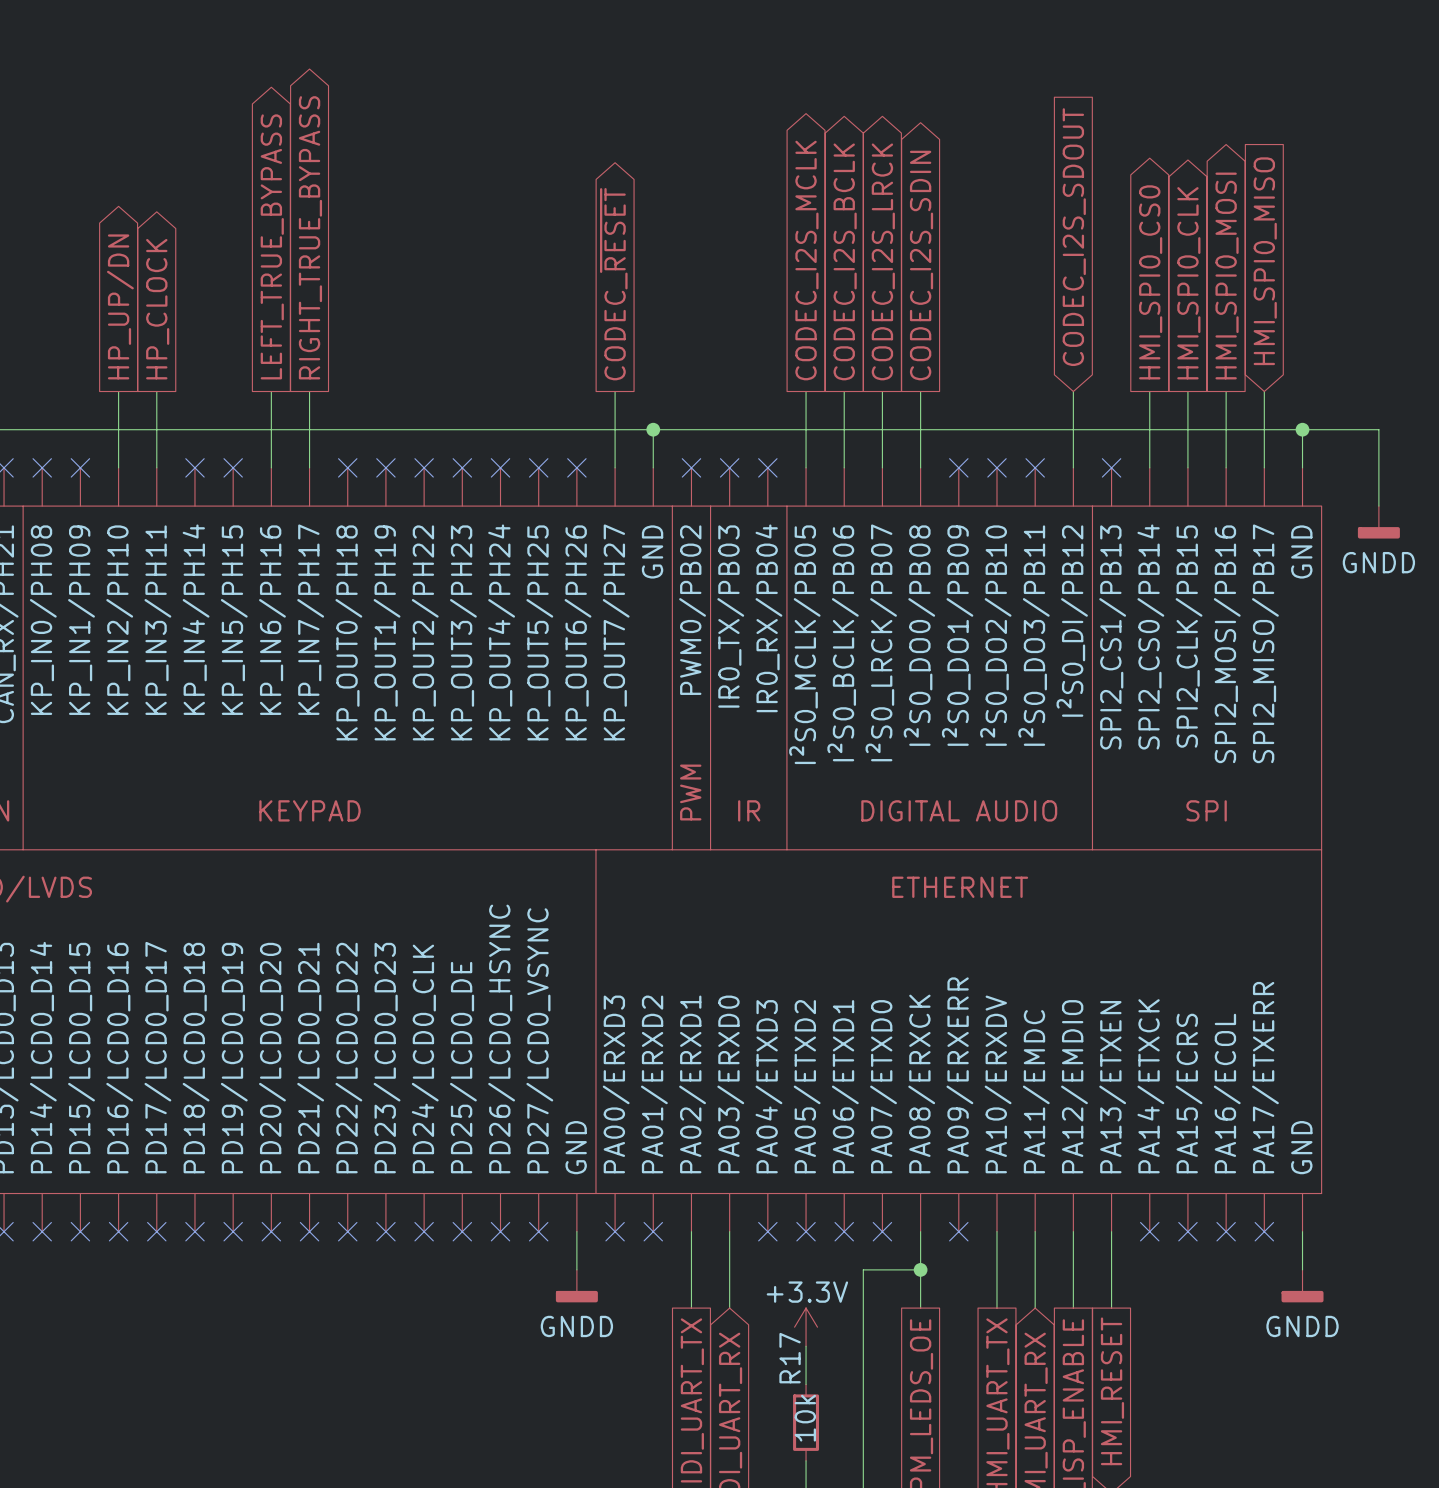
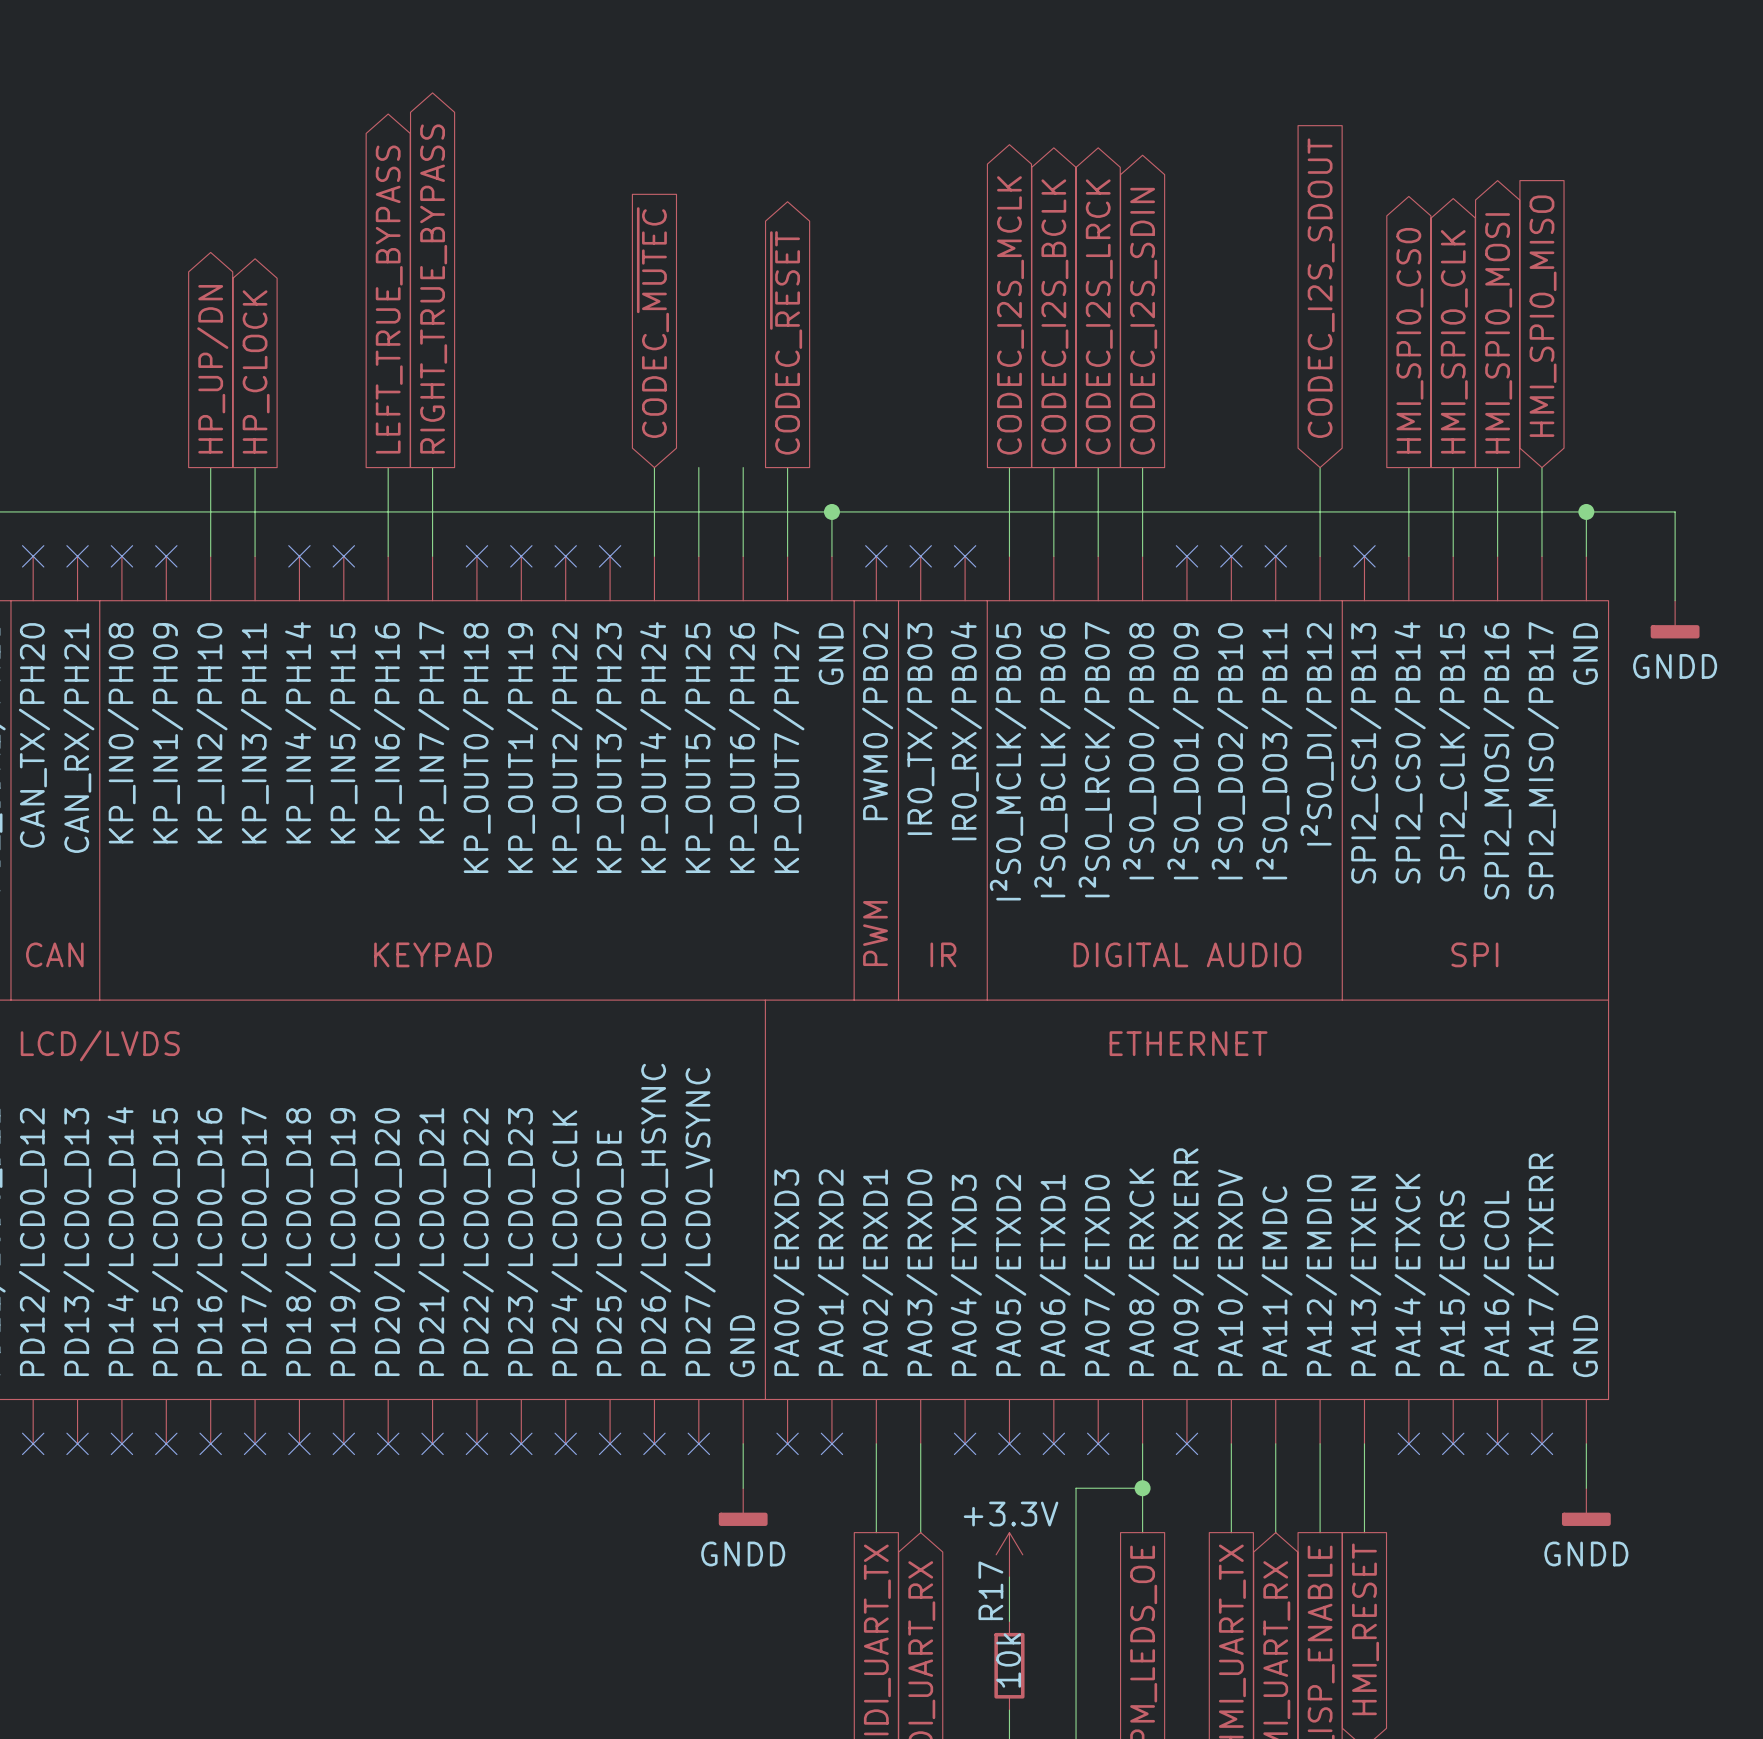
global label: none -> CODEC_~{MUTEC} (652, 322)
wire: none -> (654, 467) (654, 556)
wire: none -> (698, 467) (698, 556)
wire: none -> (743, 467) (743, 556)
no-connect mark: (500, 467) -> none
no-connect mark: (538, 467) -> none
no-connect mark: (576, 467) -> none

